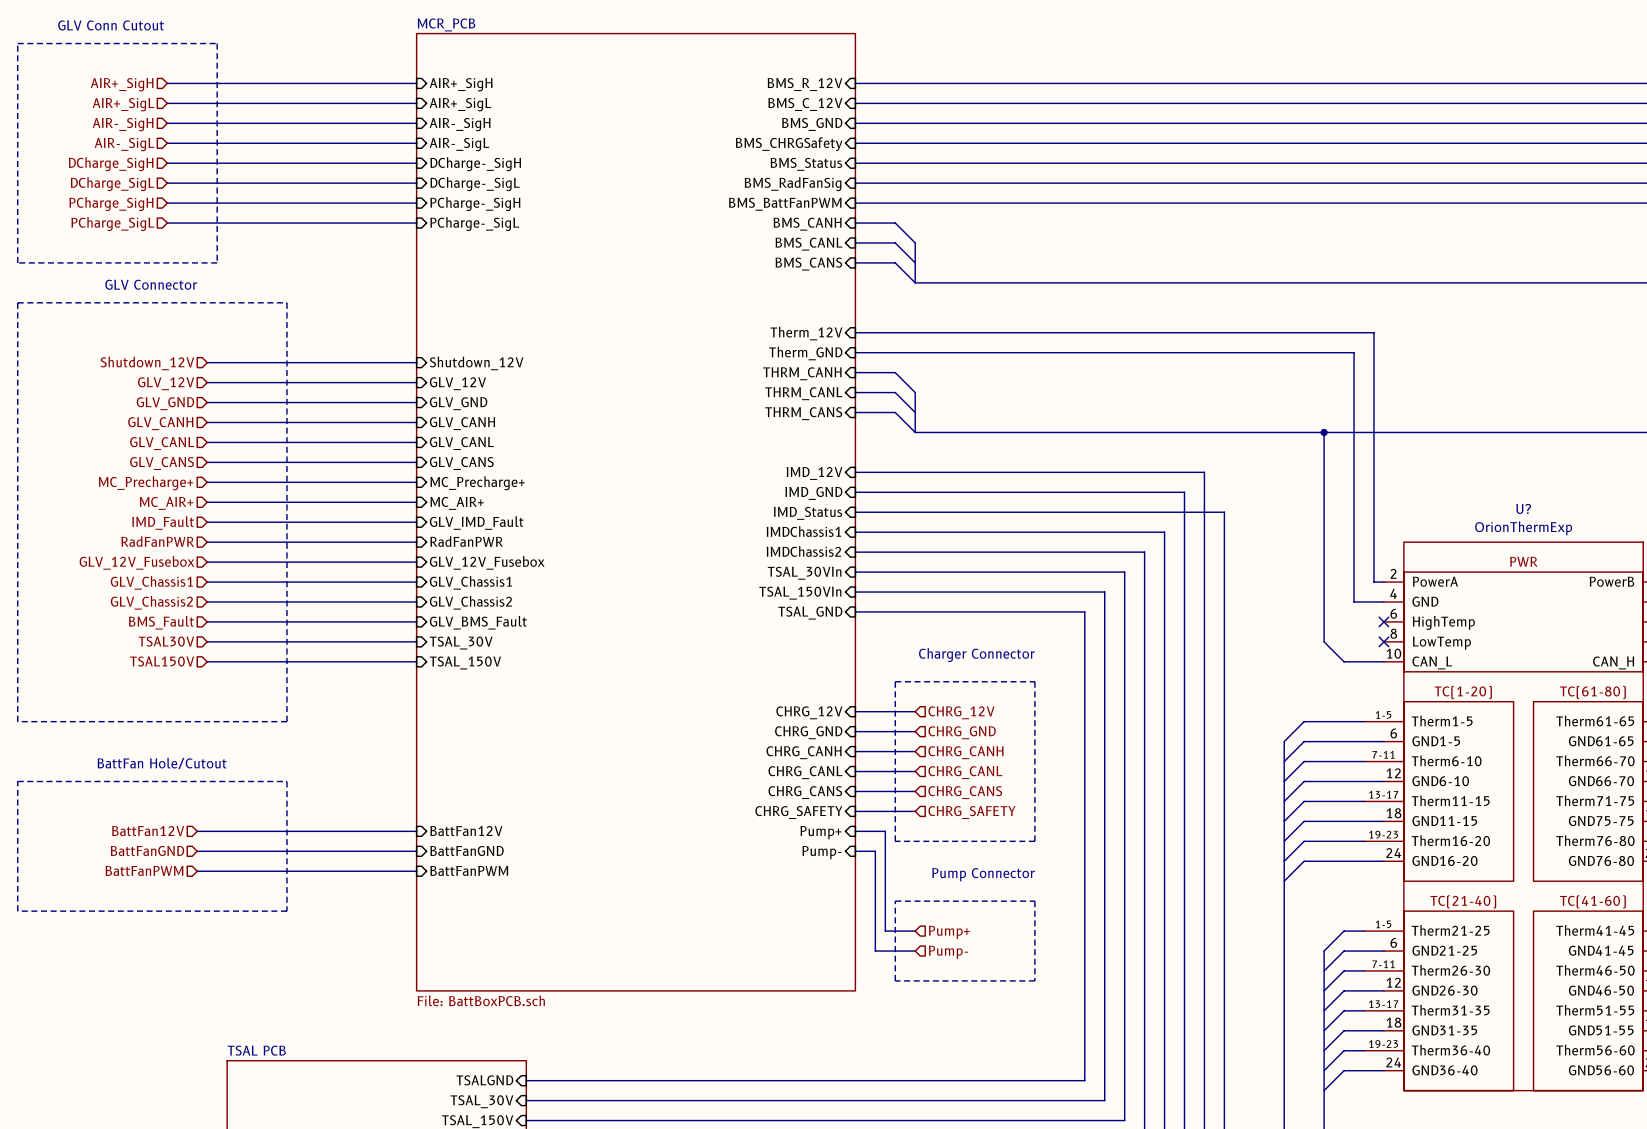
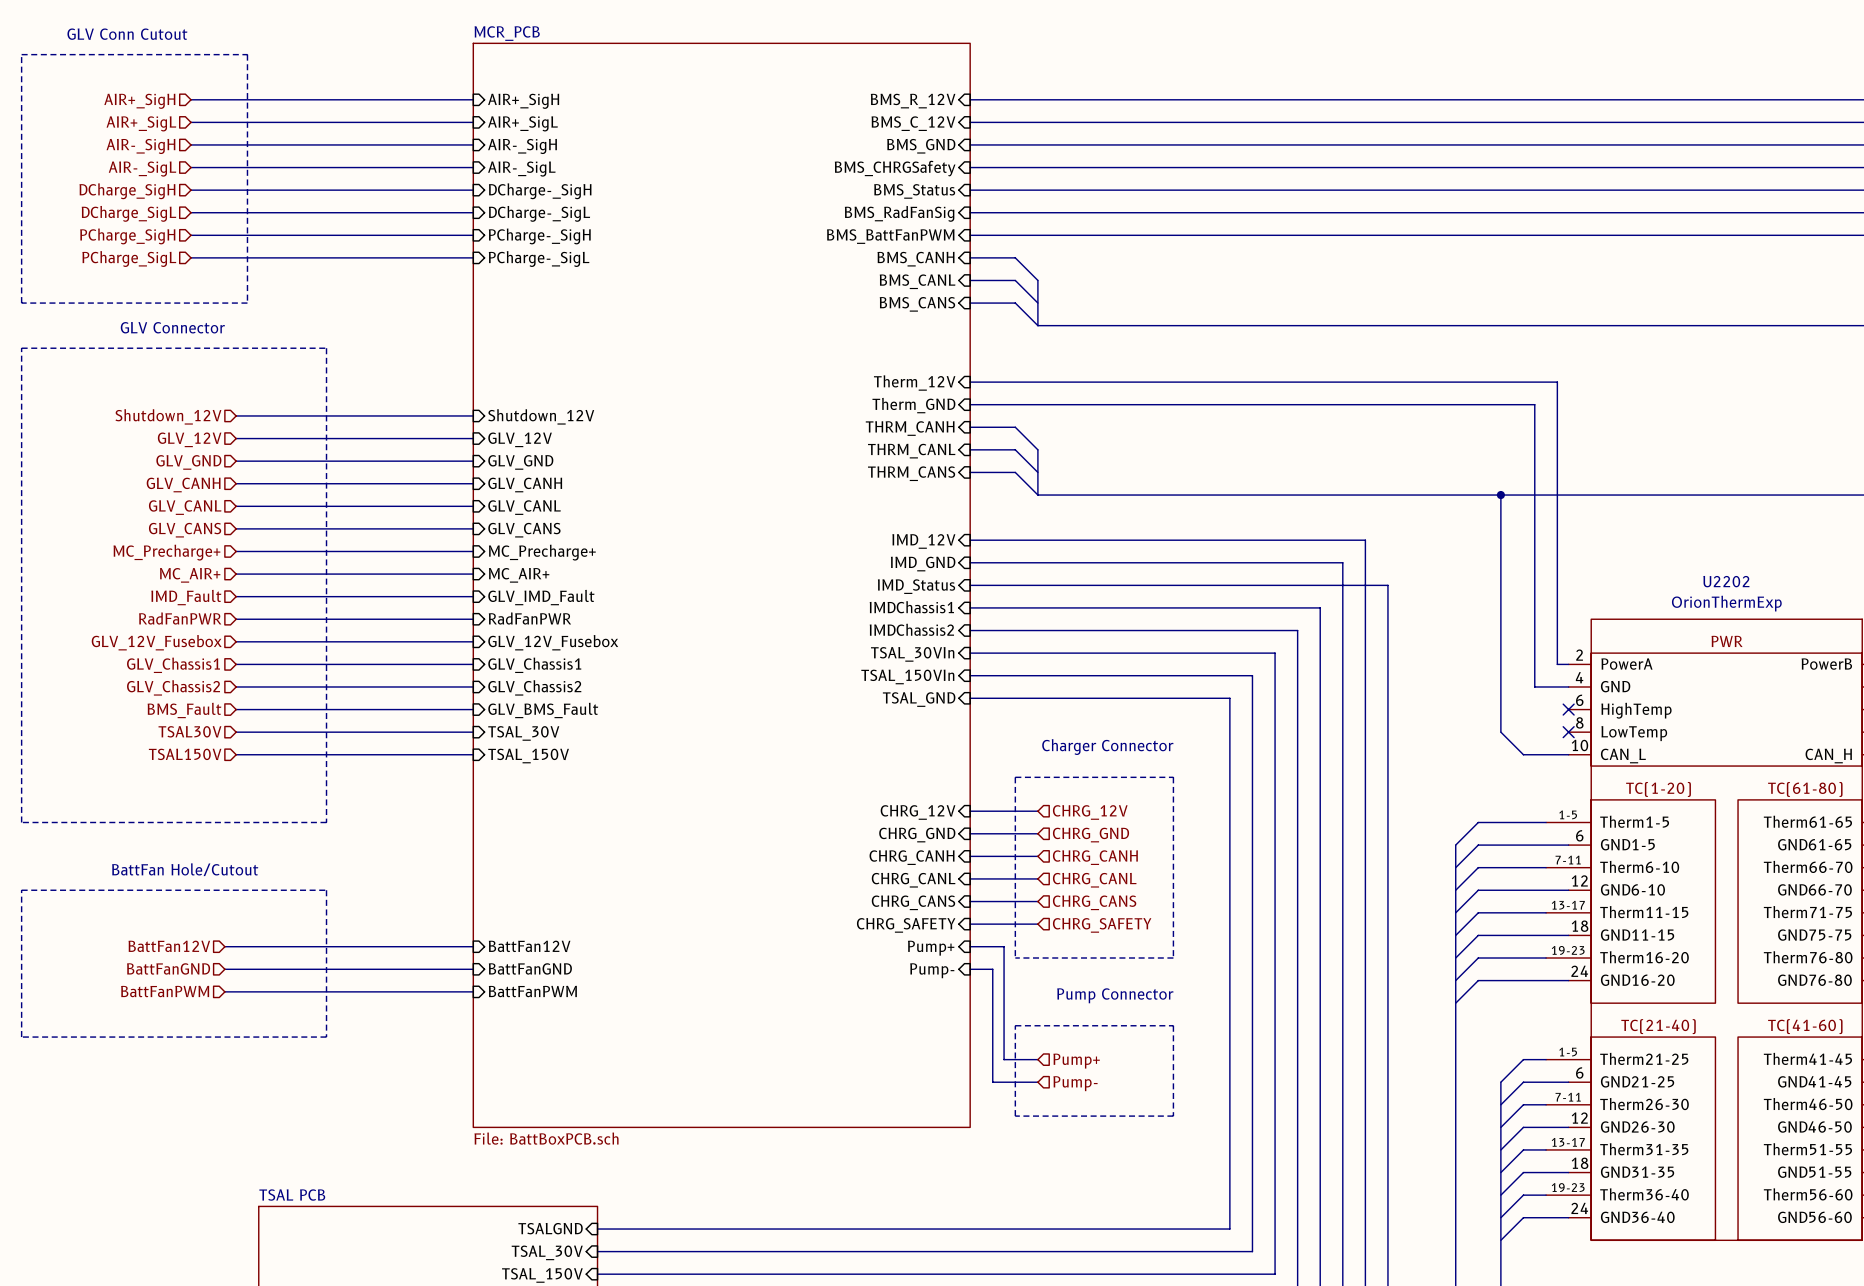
U? name: U? (1523, 508) -> U2202 (1726, 581)

